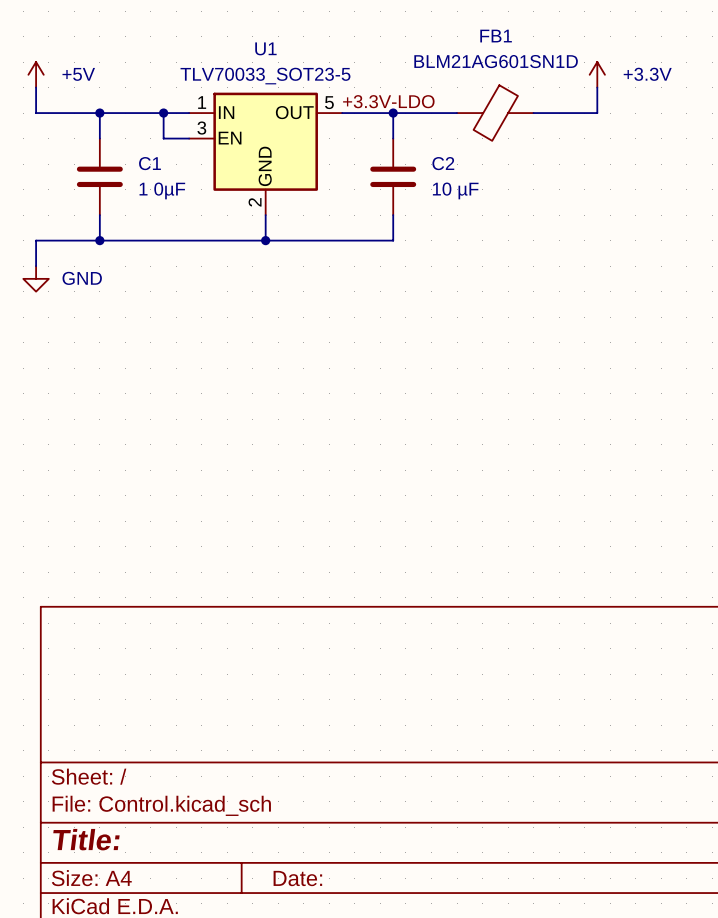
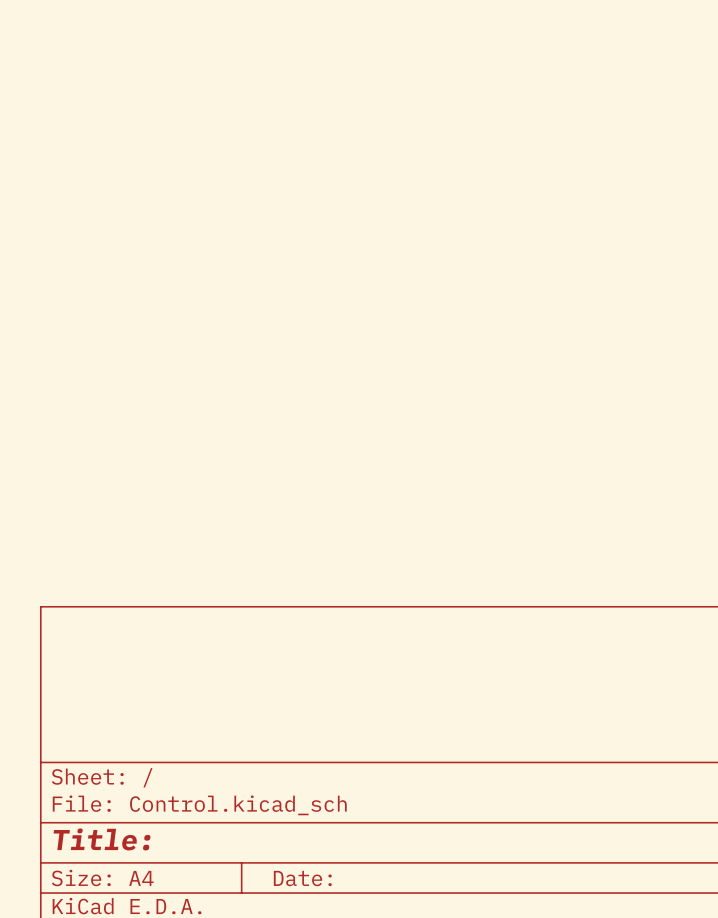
power symbol: +5V (36, 74) -> none
power symbol: +3.3V (597, 74) -> none
wire: (36, 87) (36, 113) (189, 113) -> none
wire: (597, 87) (597, 113) (533, 113) -> none
label: +3.3V-LDO (388, 101) -> none
wire: (99, 113) (99, 138) -> none
junction: (99, 113) -> none
wire: (163, 113) (163, 138) (189, 138) -> none
junction: (163, 113) -> none
wire: (342, 113) (457, 113) -> none
wire: (393, 113) (393, 138) -> none
junction: (393, 113) -> none
FB1: BLM21AG601SN1D (495, 113) -> none
U1: TLV70033_SOT23-5 (265, 153) -> none
C1: 1 0µF (99, 176) -> none
C2: 10 µF (393, 176) -> none
wire: (99, 215) (99, 240) -> none
wire: (265, 215) (265, 240) -> none
wire: (393, 215) (393, 240) (36, 240) (36, 266) -> none
junction: (99, 240) -> none
junction: (265, 240) -> none
power symbol: GND (36, 278) -> none

